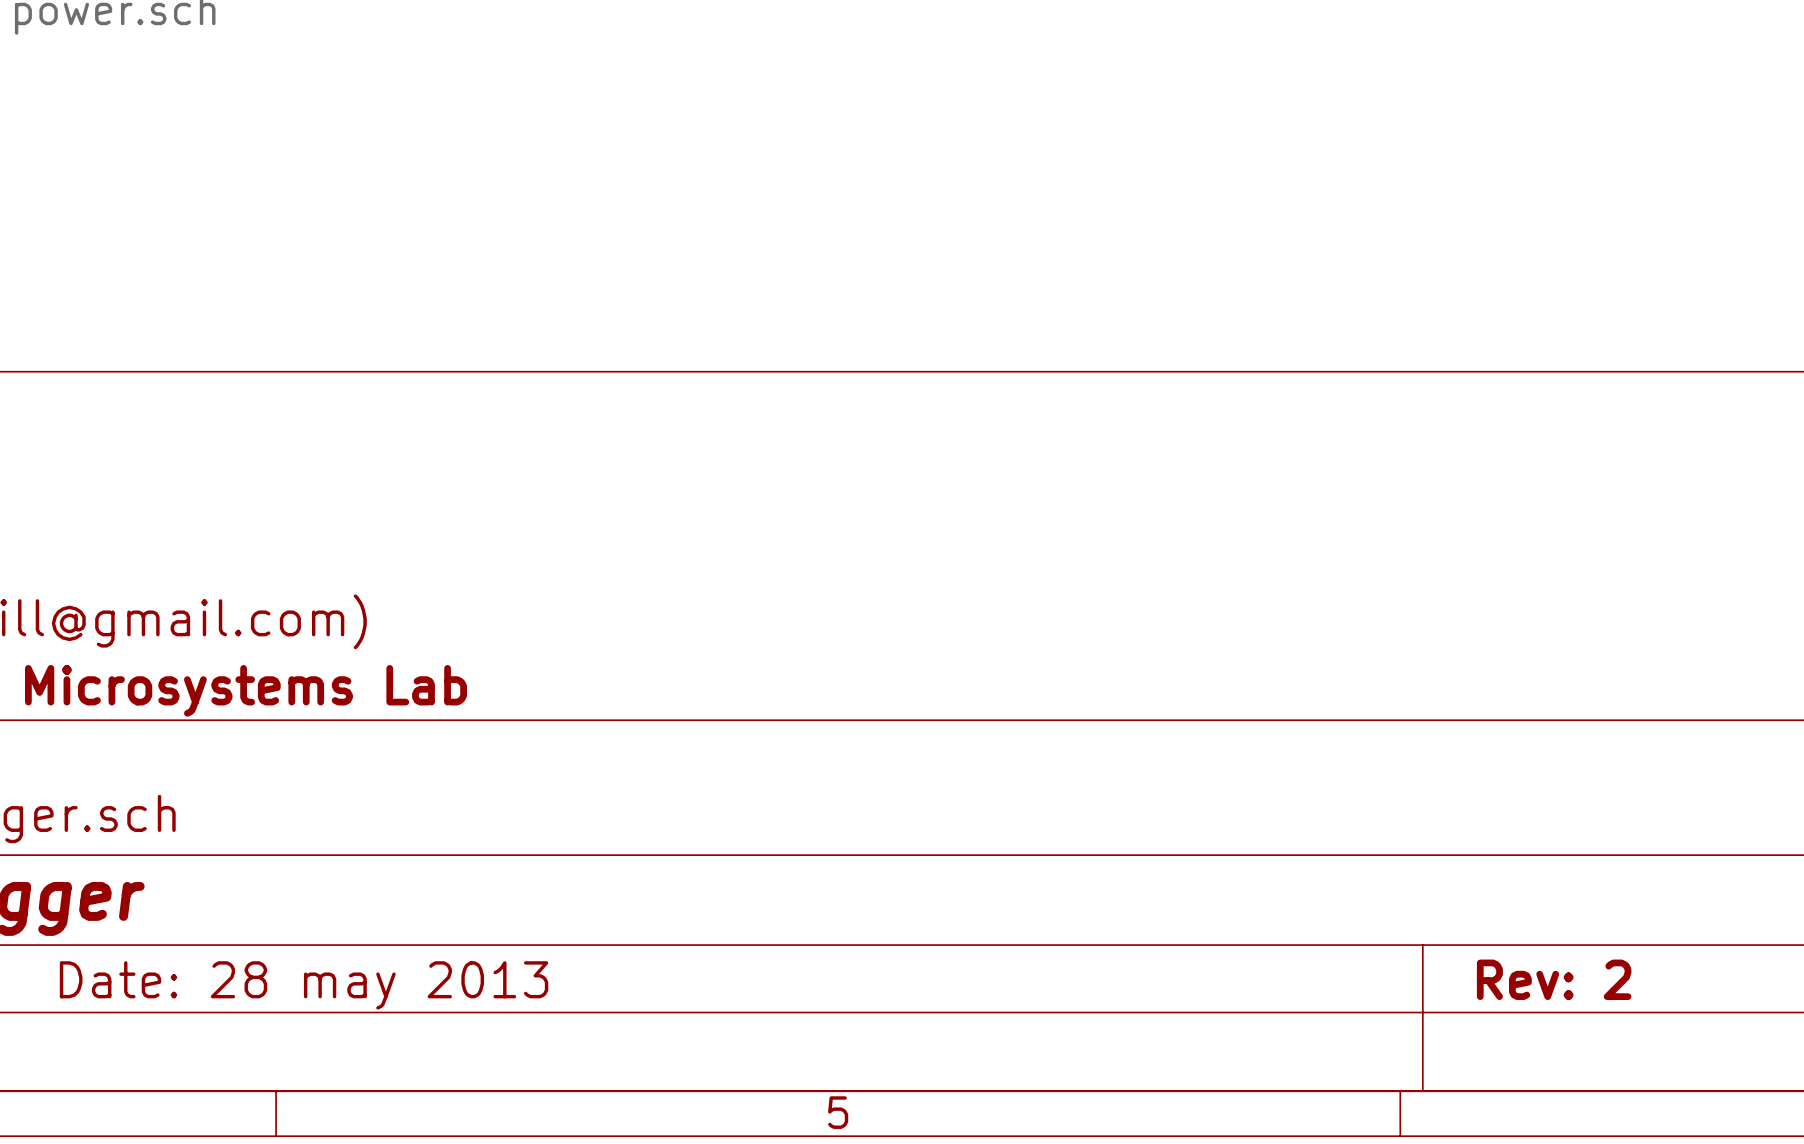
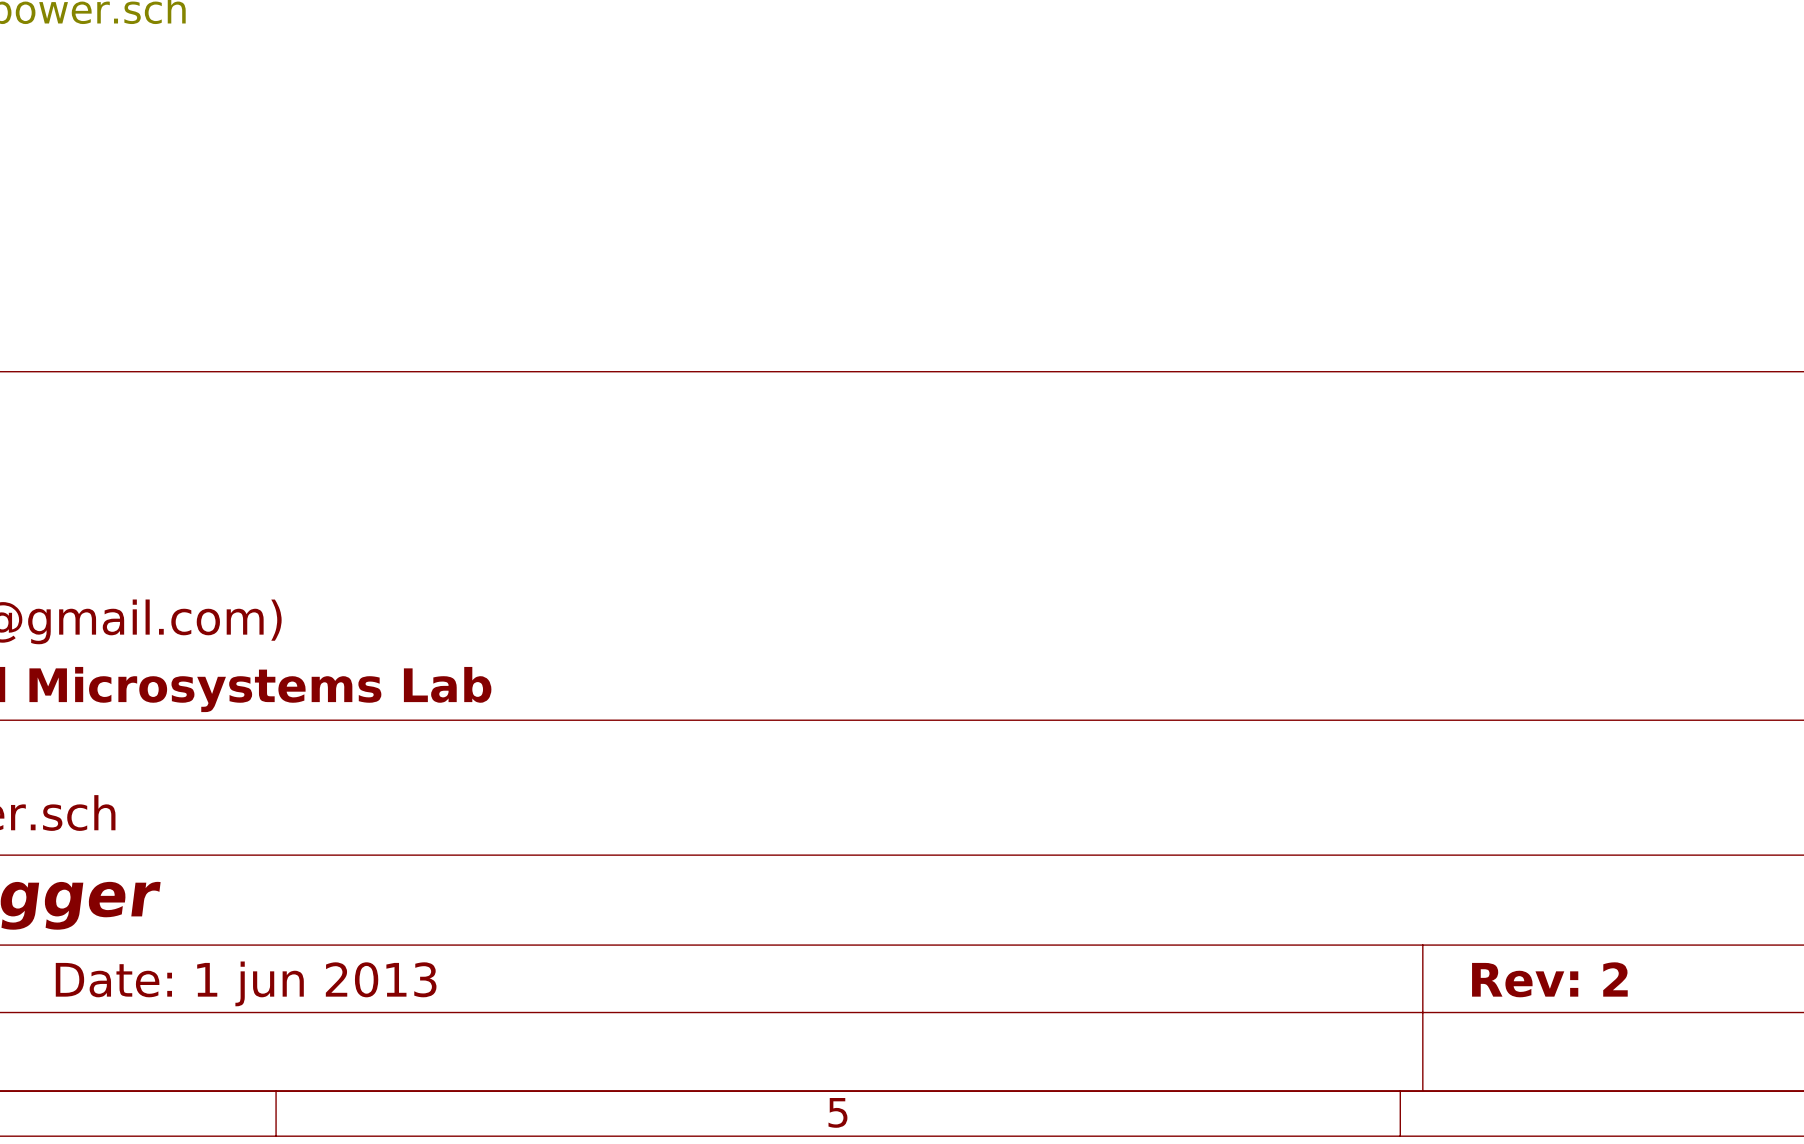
title block: Date: 28 may 2013 (304, 985) -> Date: 1 jun 2013 (246, 983)

